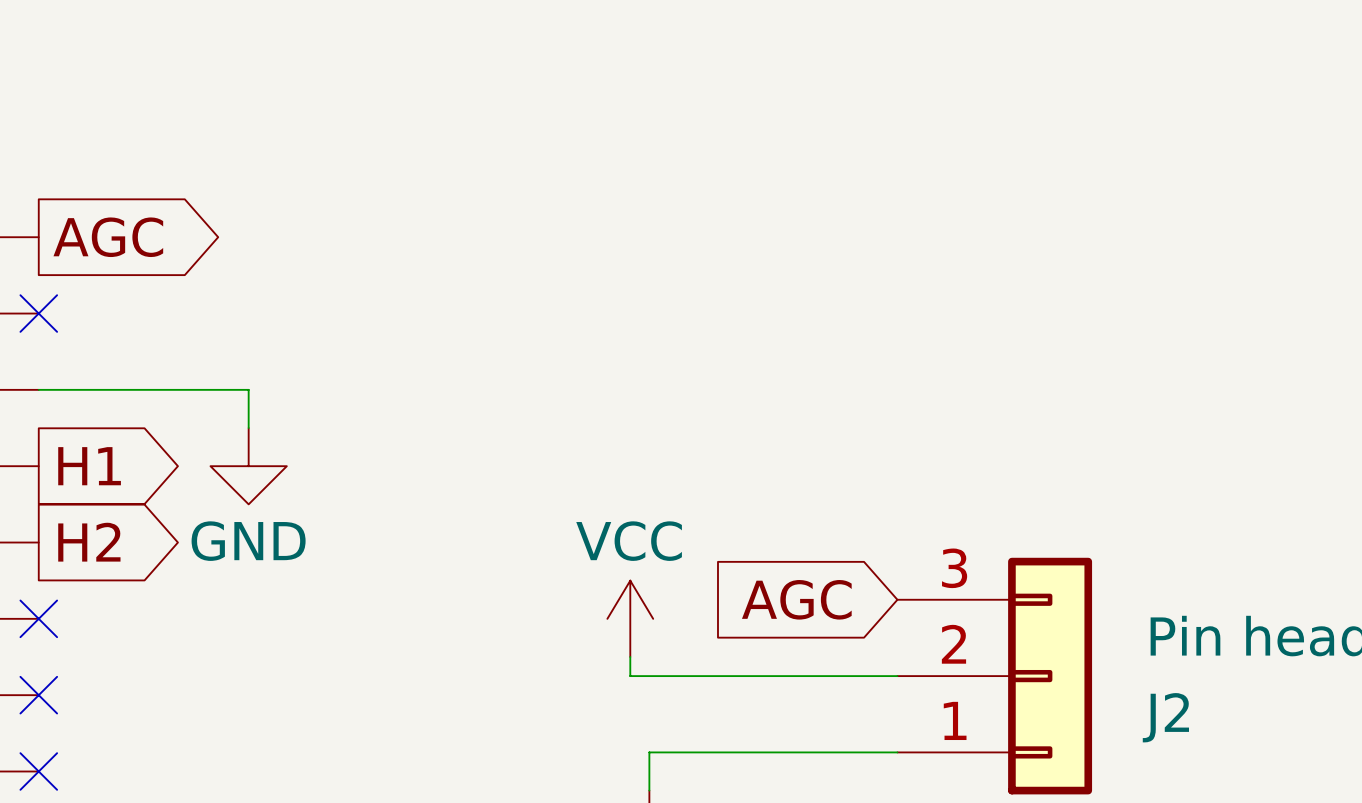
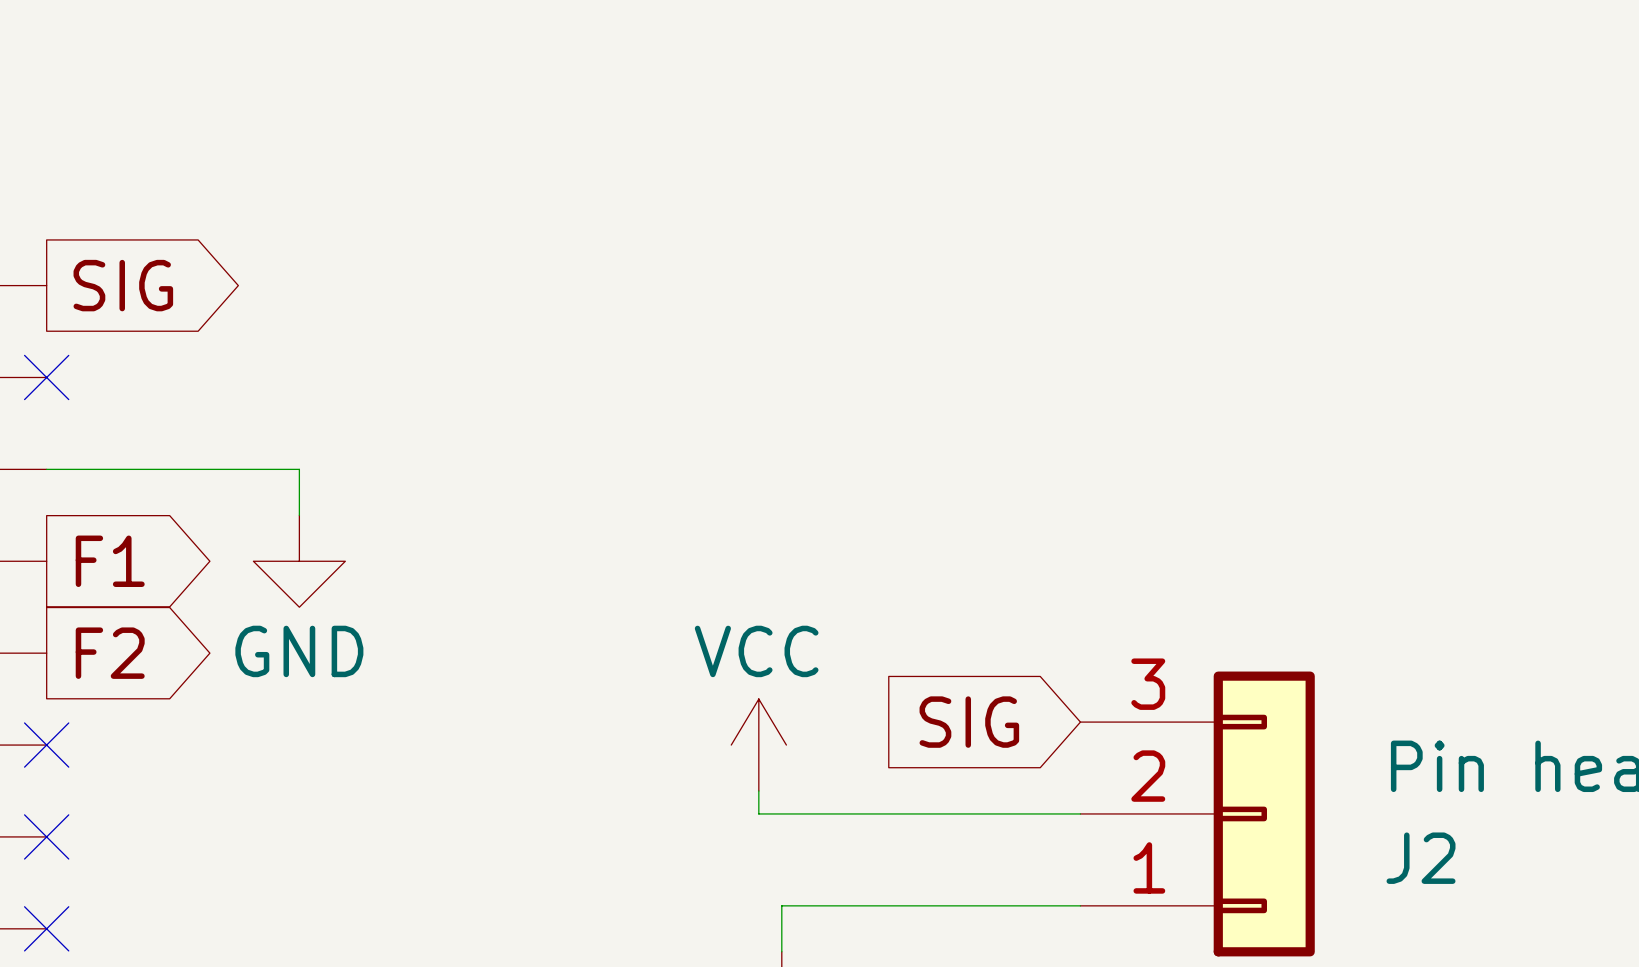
global label: AGC (108, 237) -> SIG (123, 285)
global label: H1 (89, 466) -> F1 (110, 561)
global label: H2 (89, 542) -> F2 (110, 653)
global label: AGC (796, 599) -> SIG (969, 722)

